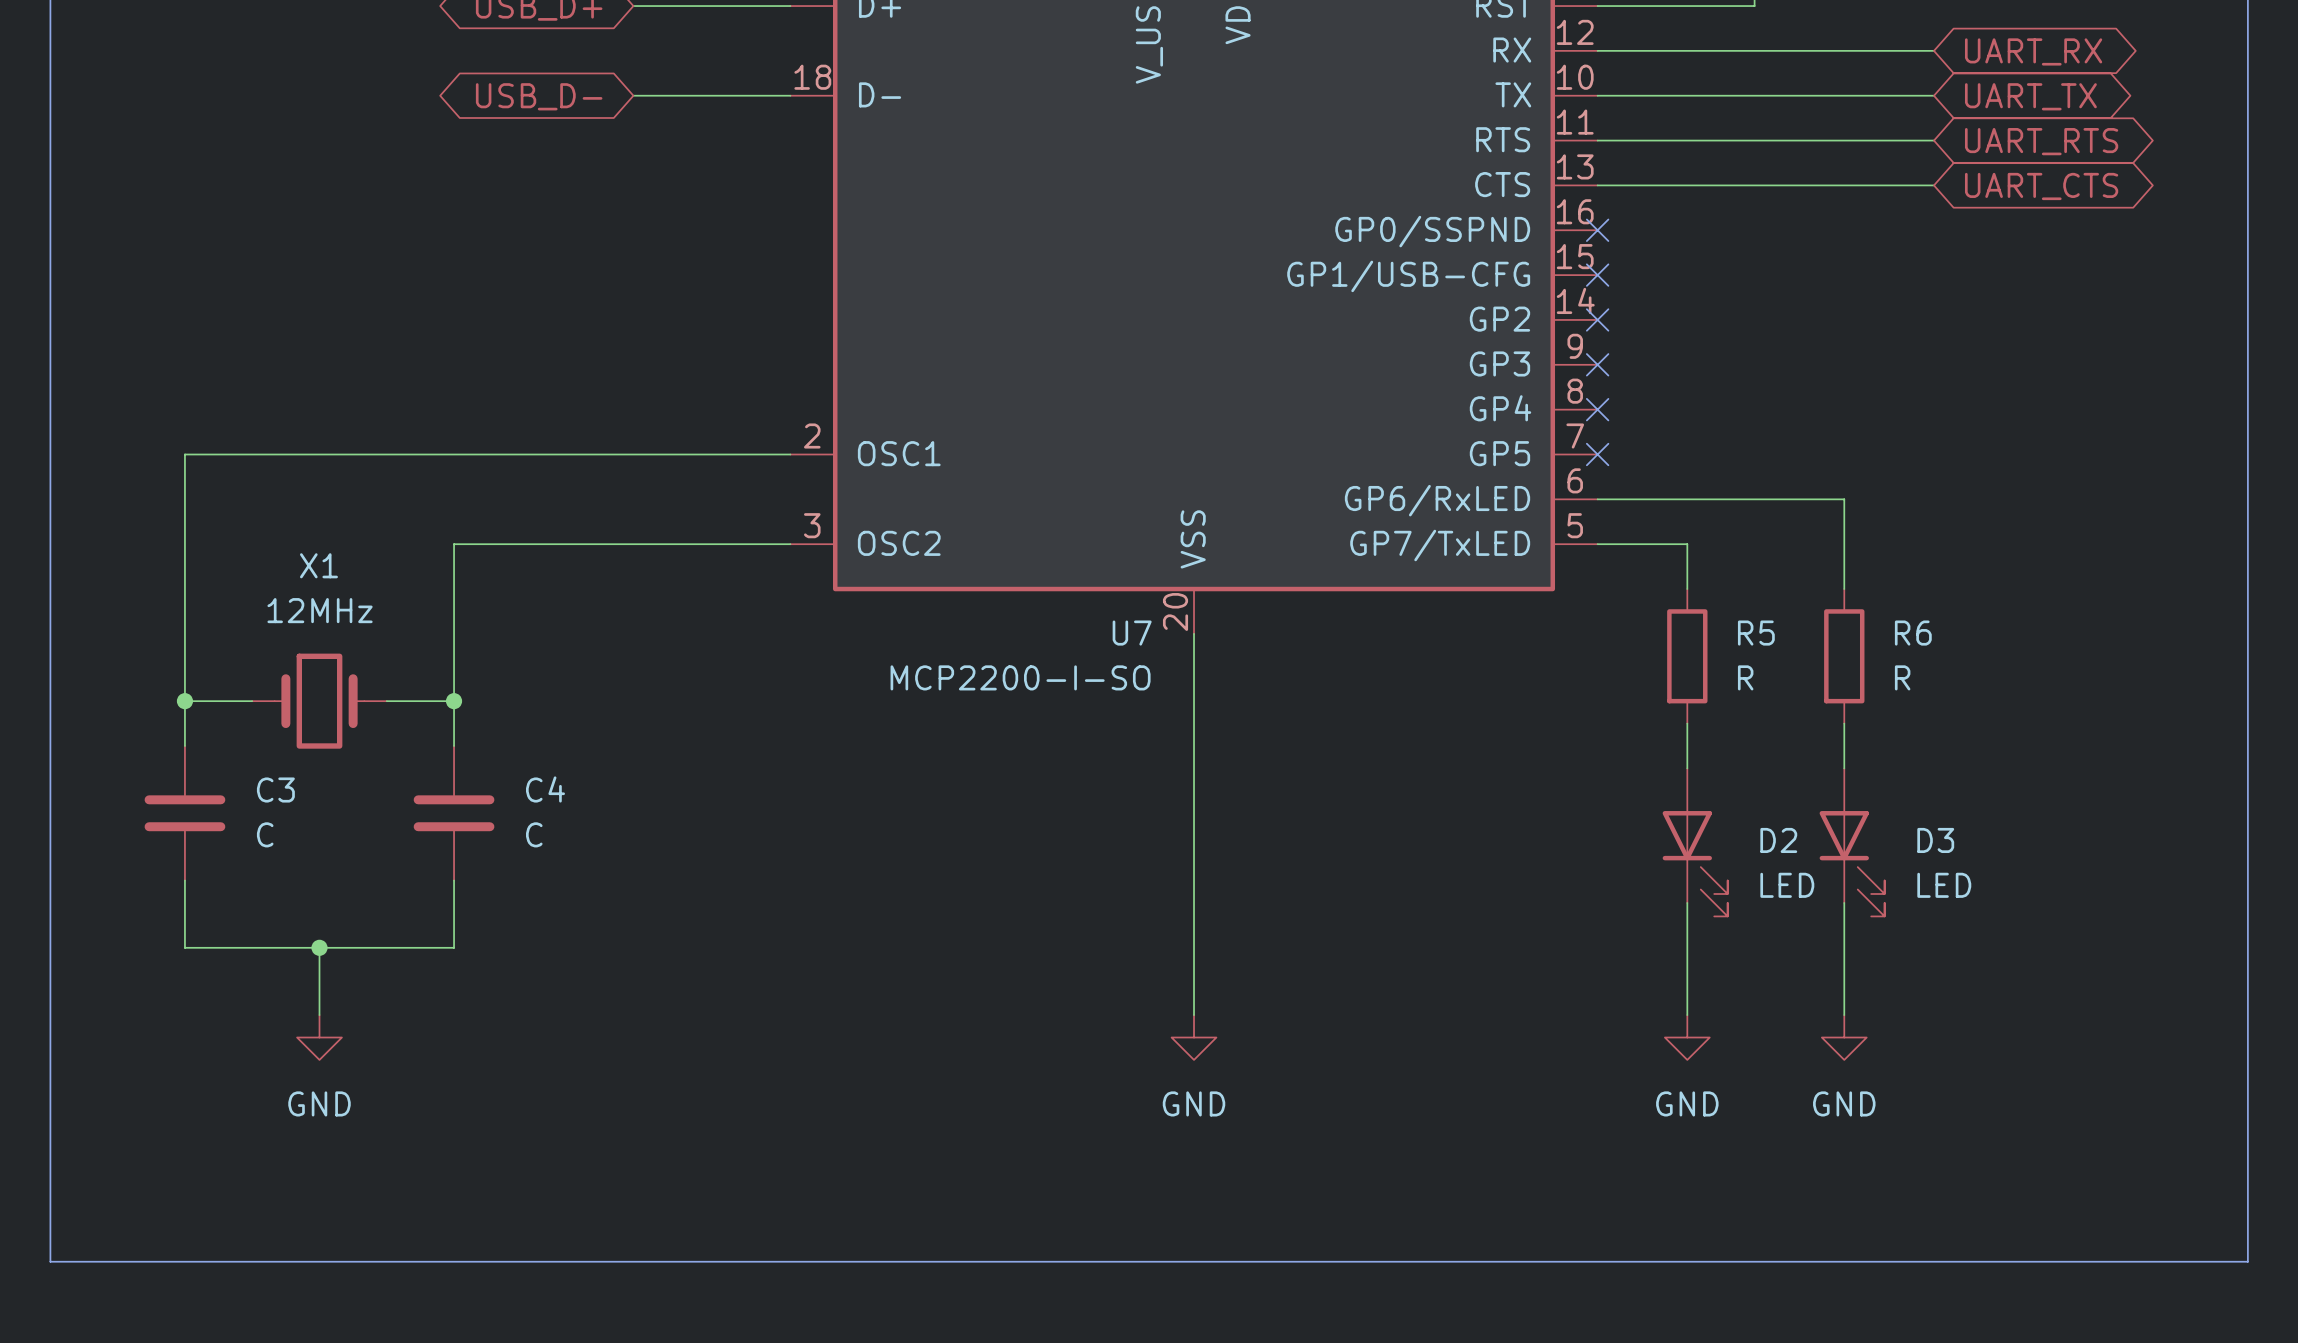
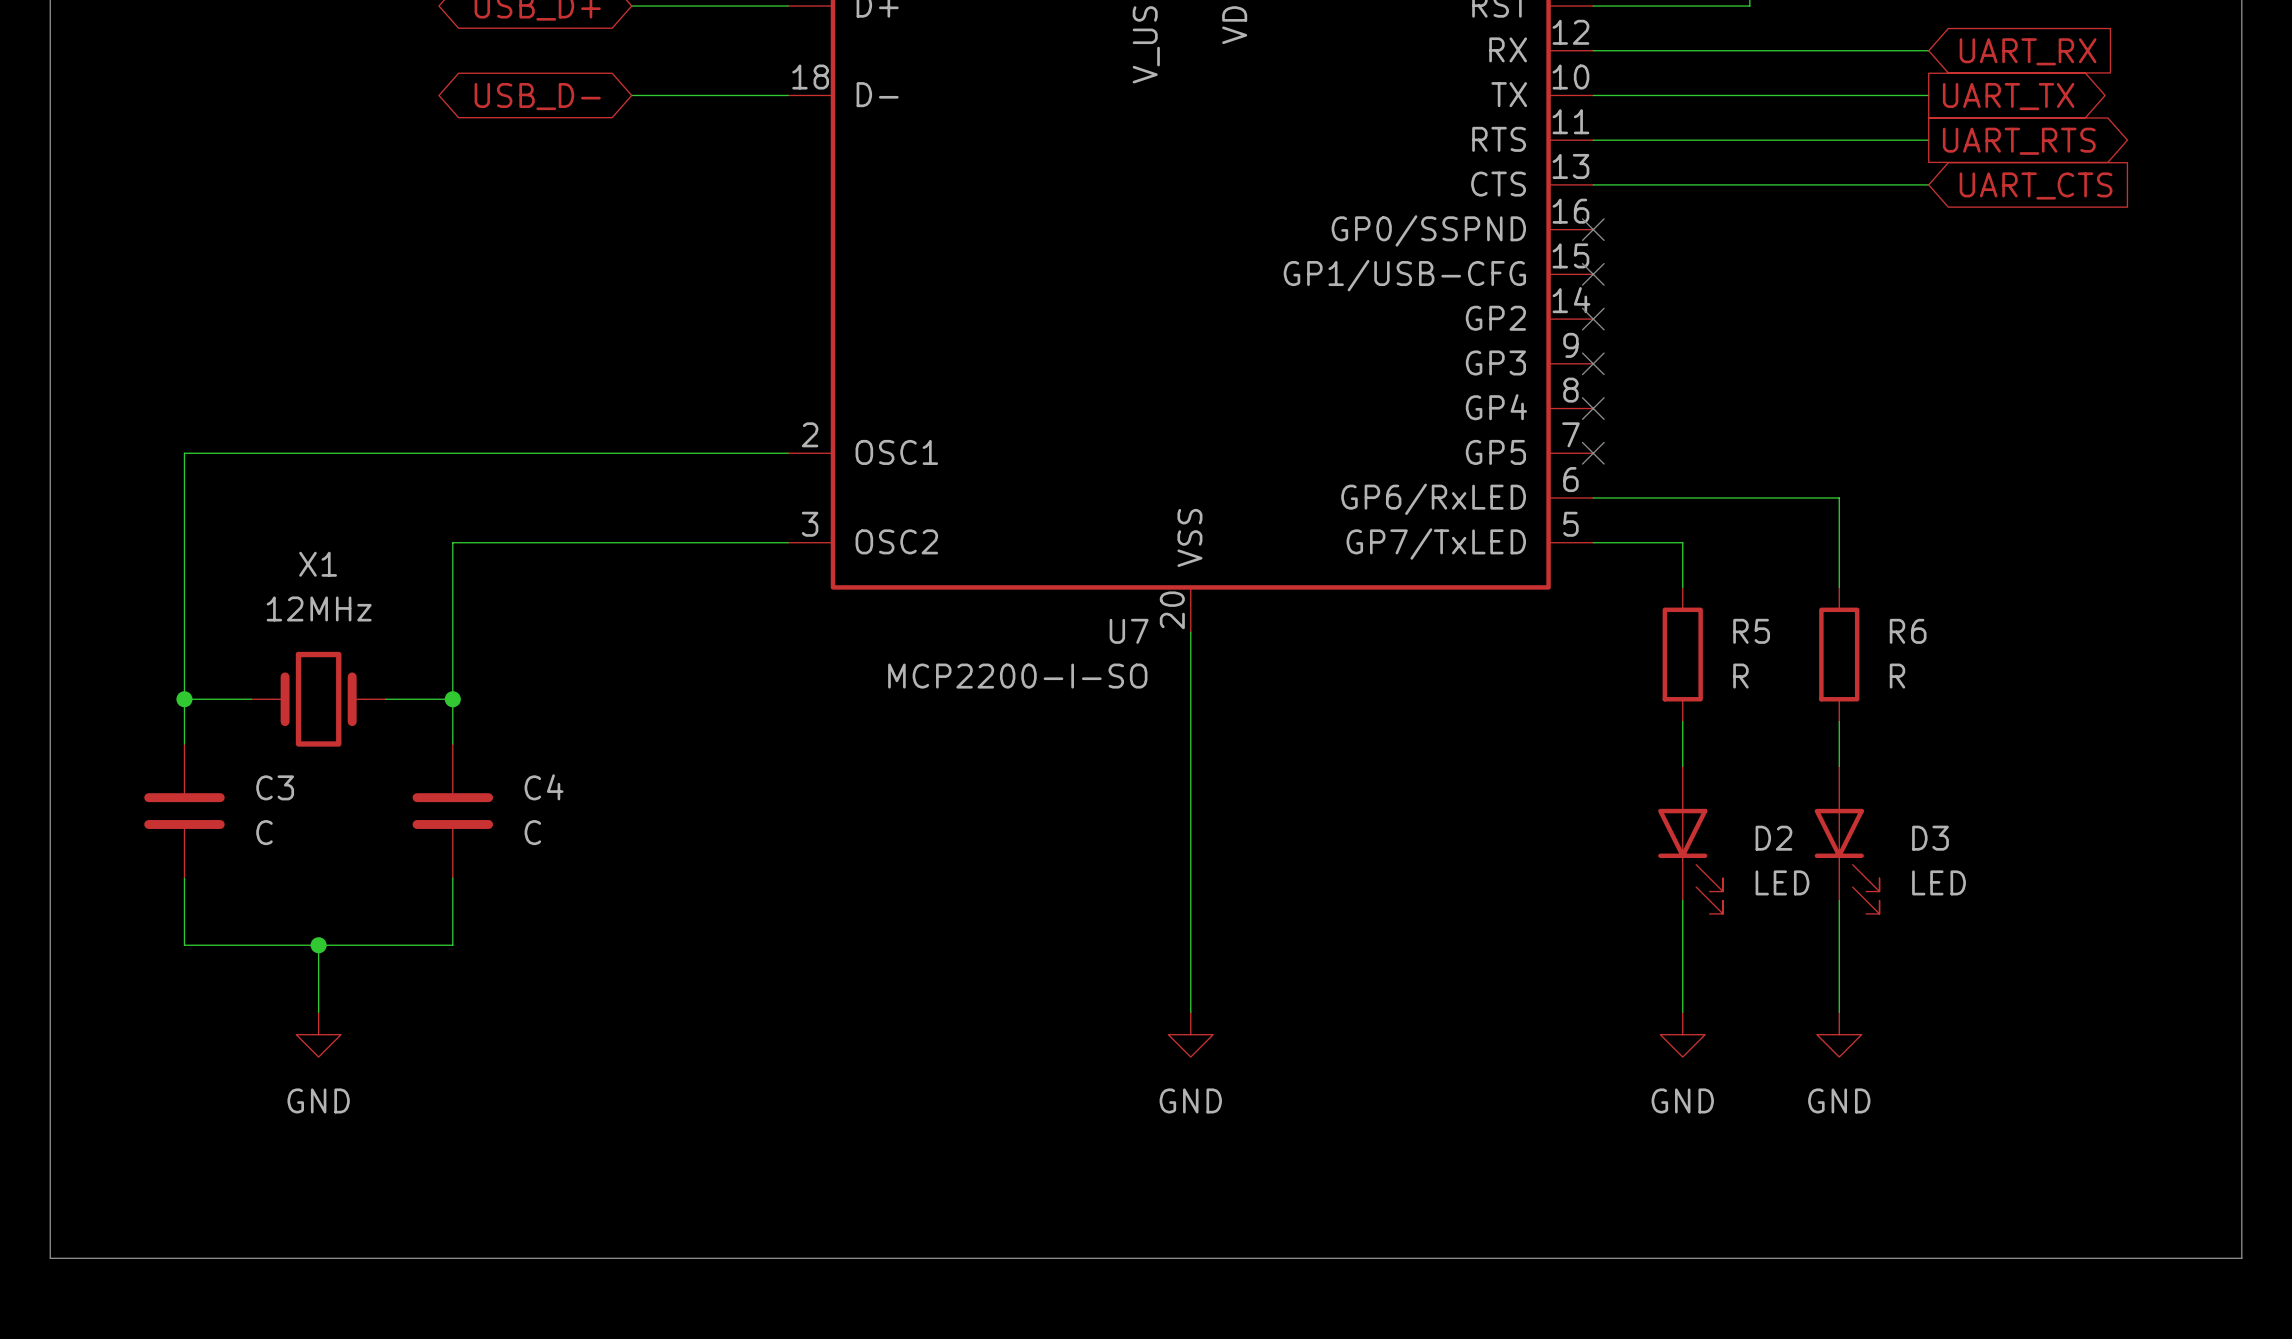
global label shape: bidirectional (2033, 51) -> input (2028, 51)
global label shape: bidirectional (2030, 96) -> output (2008, 96)
global label shape: bidirectional (2041, 141) -> output (2019, 141)
global label shape: bidirectional (2041, 186) -> input (2036, 185)

